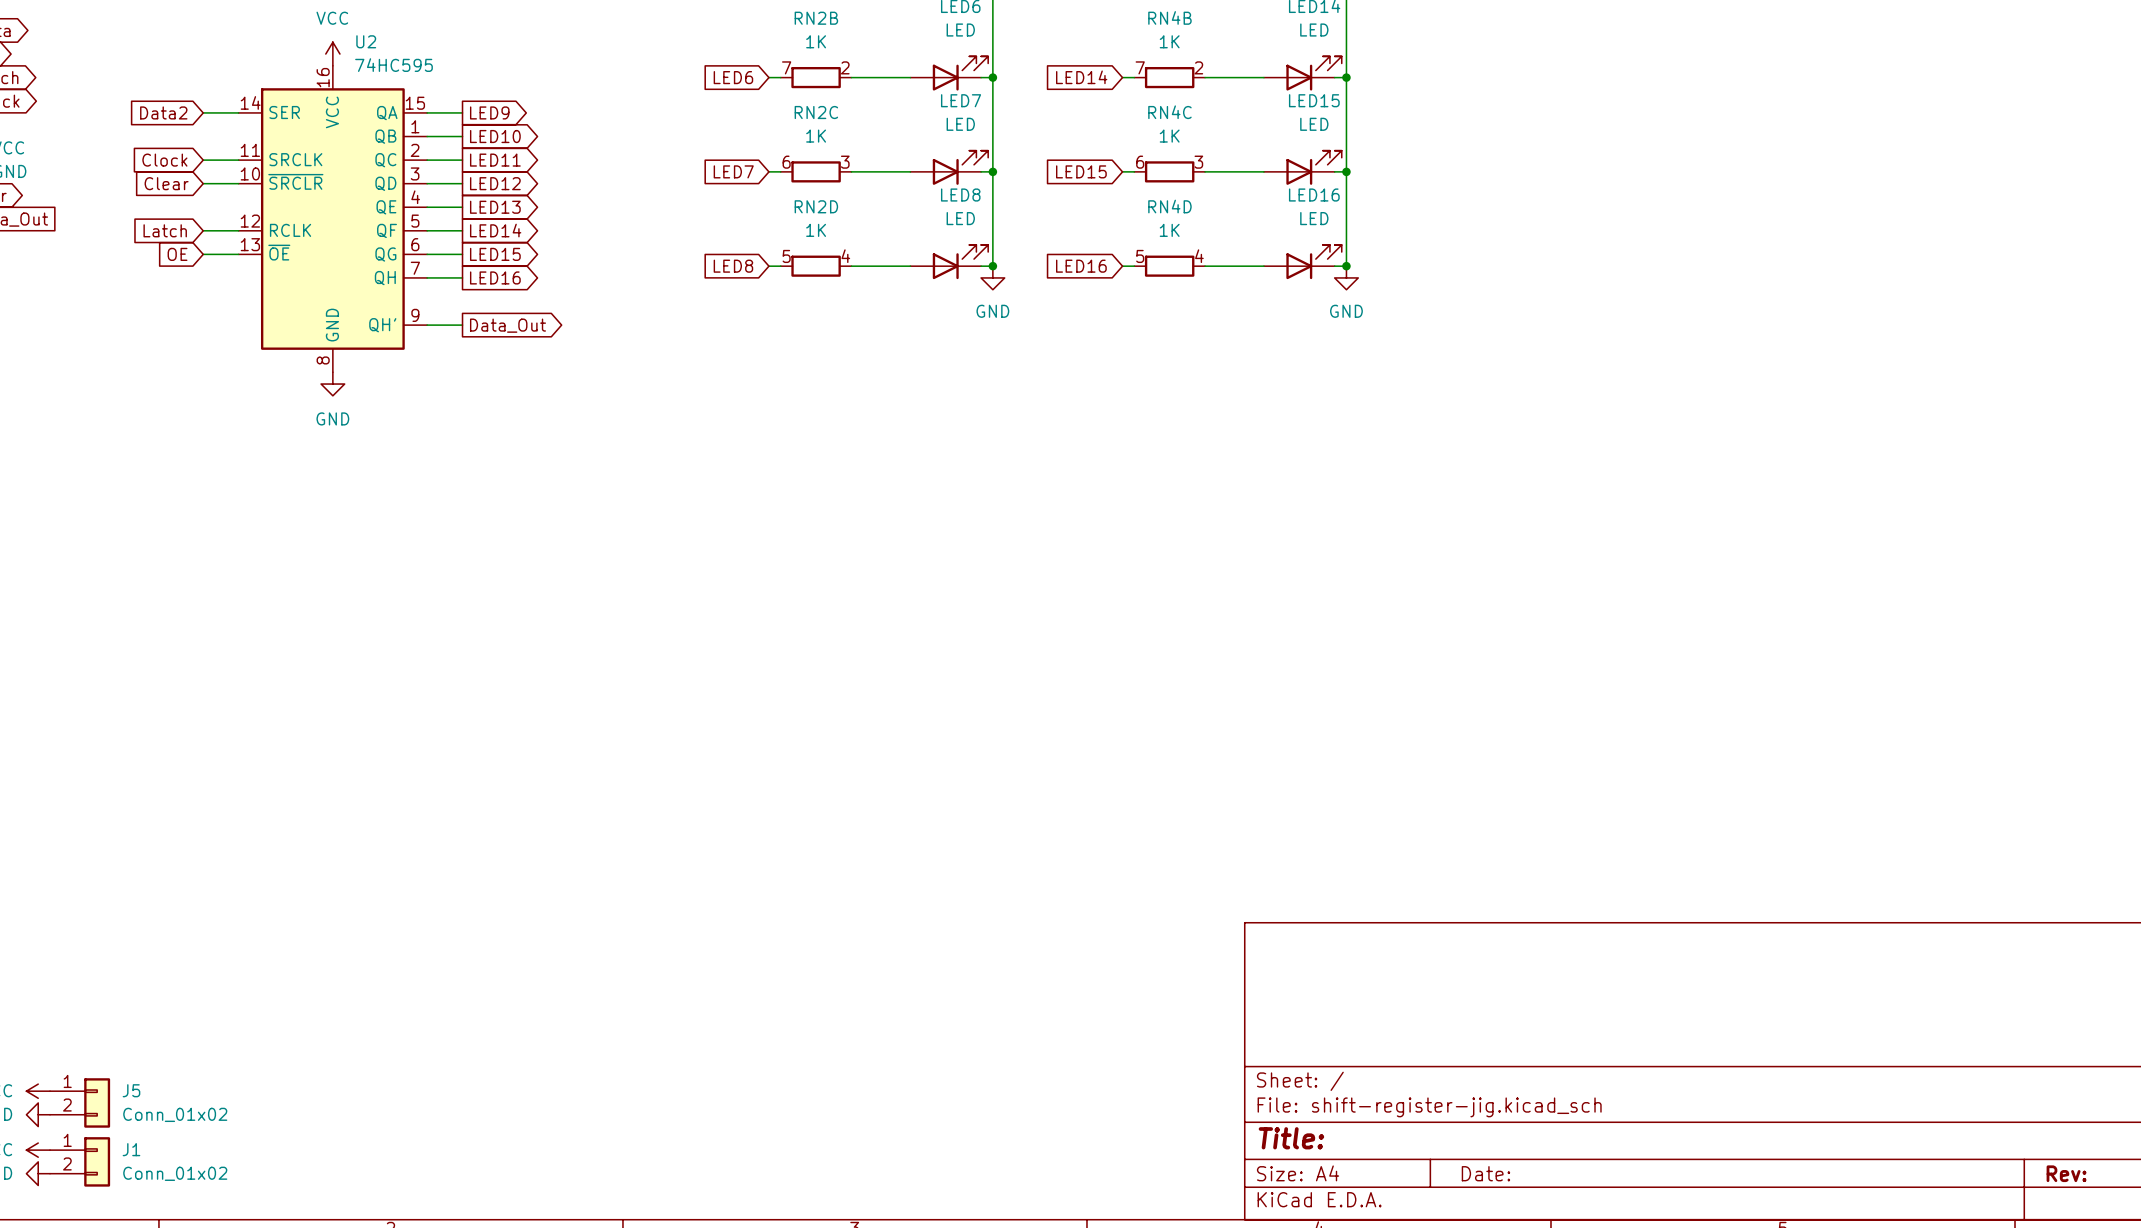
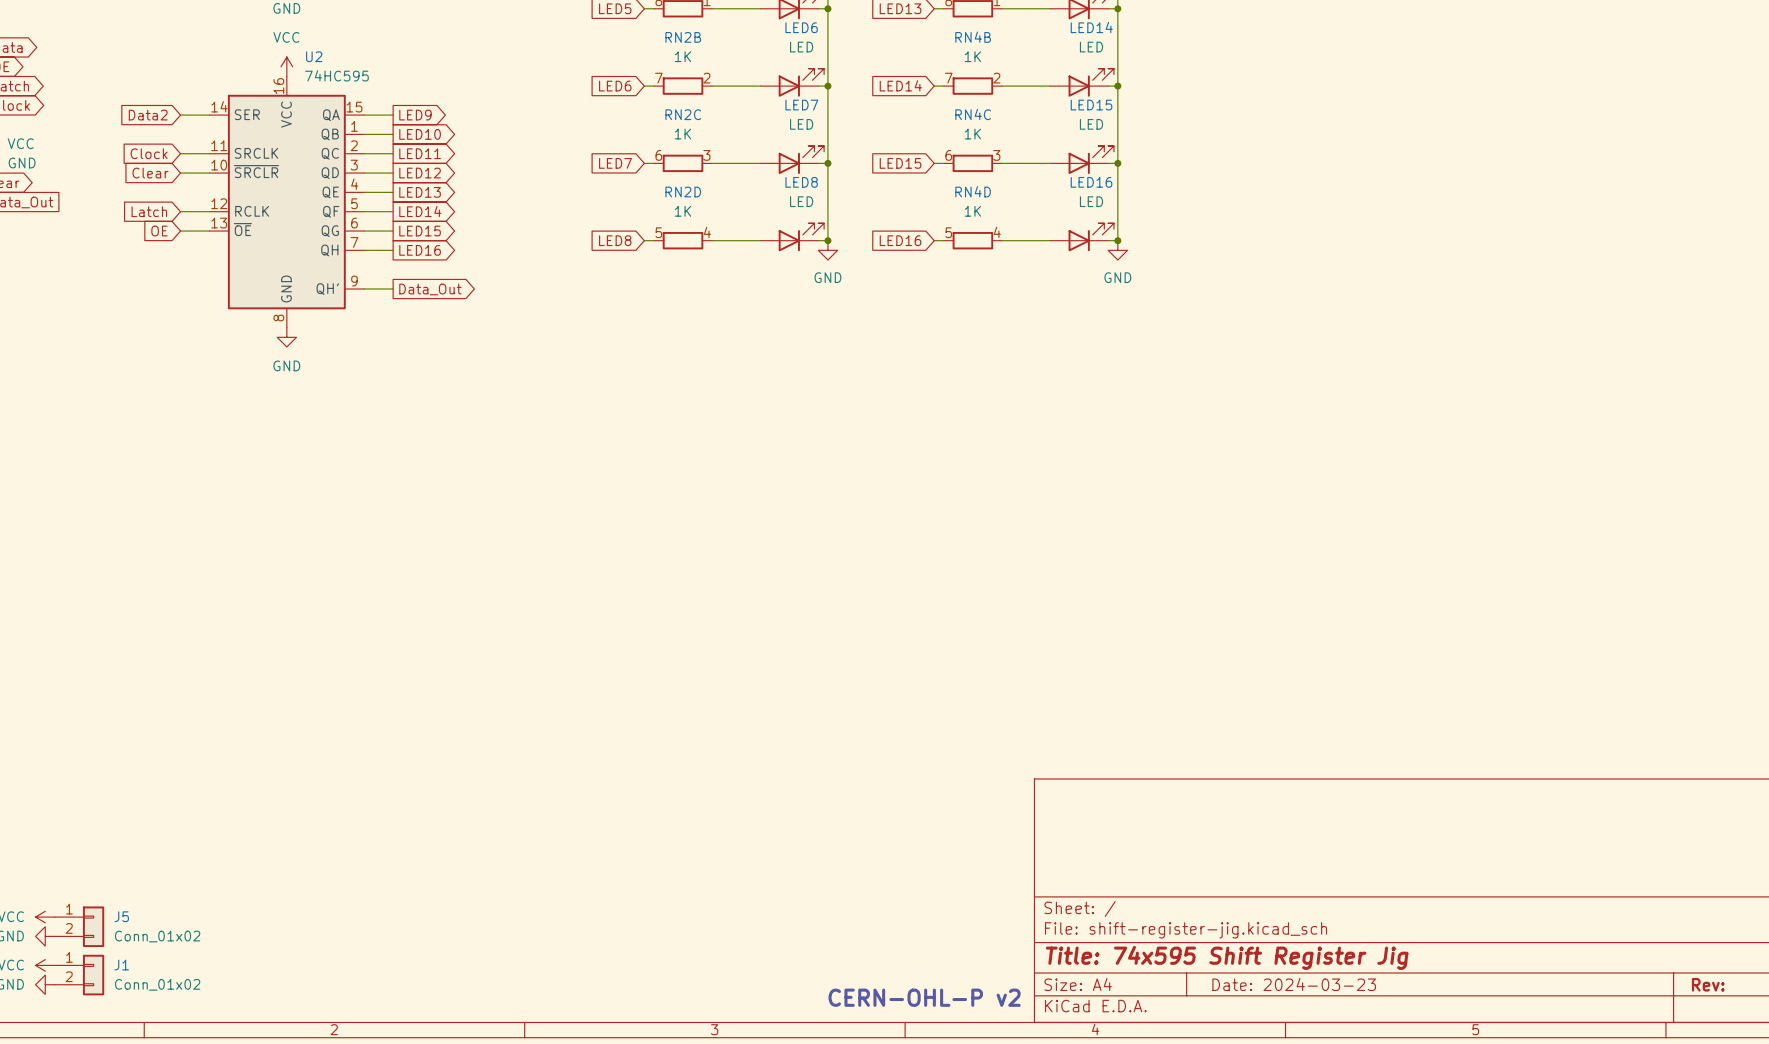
title block: Title: (1291, 1138) -> Title: 74x595 Shift Register Jig (1227, 957)
title block: Date: (1485, 1173) -> Date: 2024-03-23 (1294, 984)
text: none -> CERN-OHL-P v2 (924, 997)

